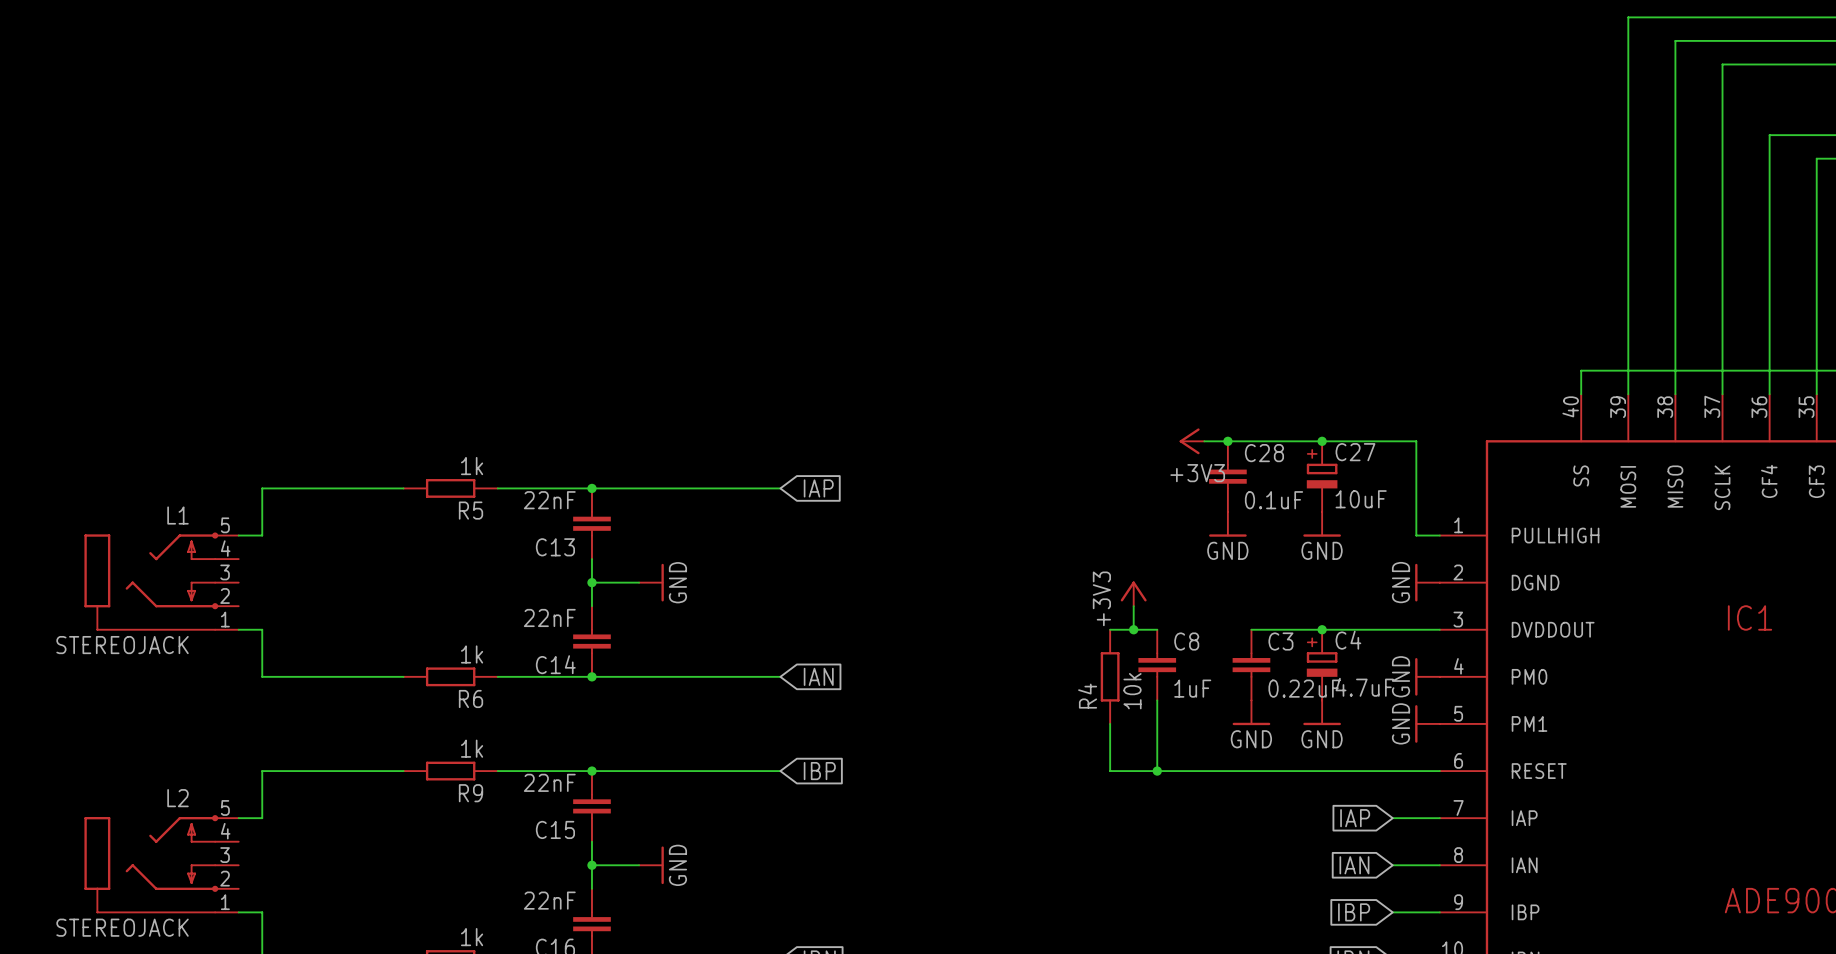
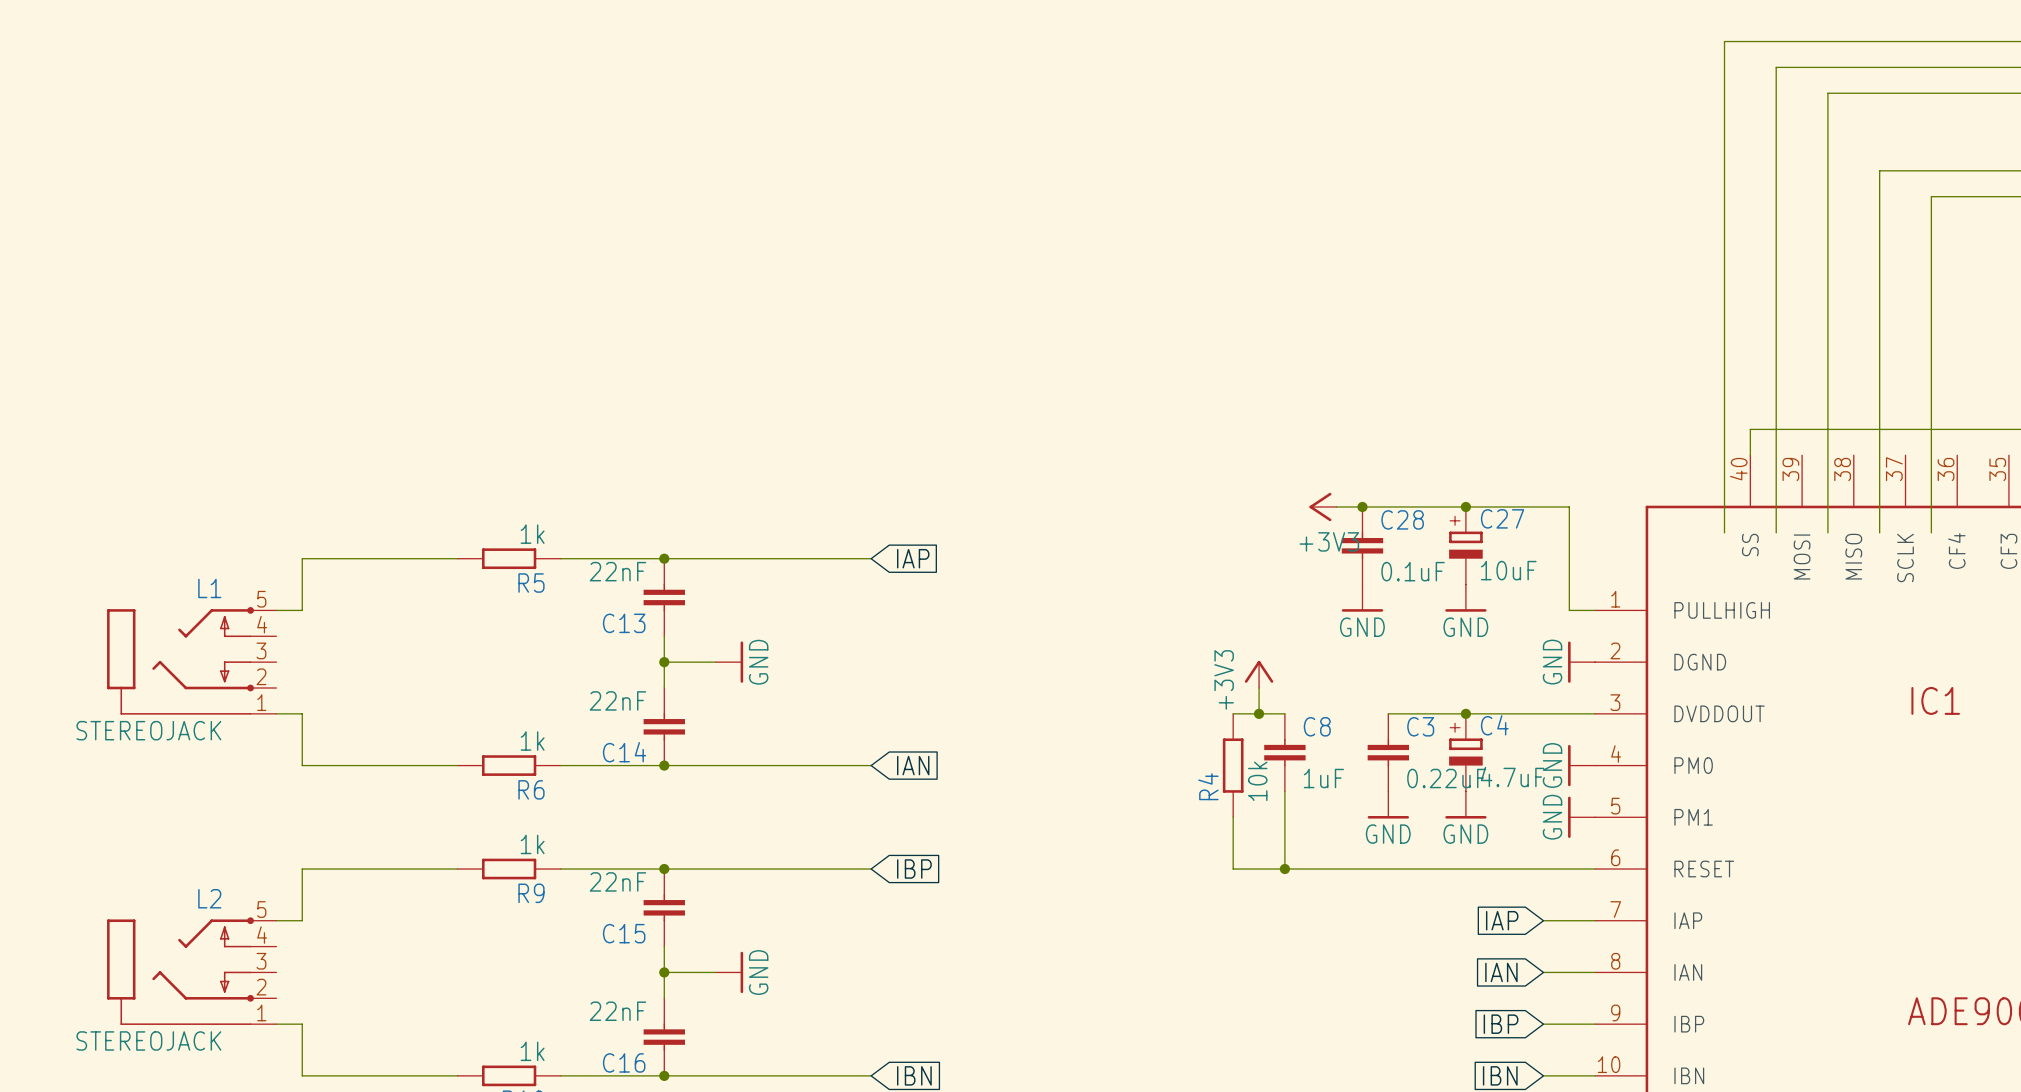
wire: (1628, 17) (1628, 394) -> (1802, 41) (1724, 41) (1724, 532)
wire: (1675, 40) (1675, 394) -> (1853, 67) (1776, 67) (1776, 532)
wire: (1722, 64) (1722, 394) -> (1905, 93) (1827, 93) (1827, 532)
wire: (1769, 135) (1769, 394) -> (1957, 170) (1879, 170) (1879, 532)
wire: (1816, 158) (1816, 394) -> (2008, 196) (1931, 196) (1931, 532)

